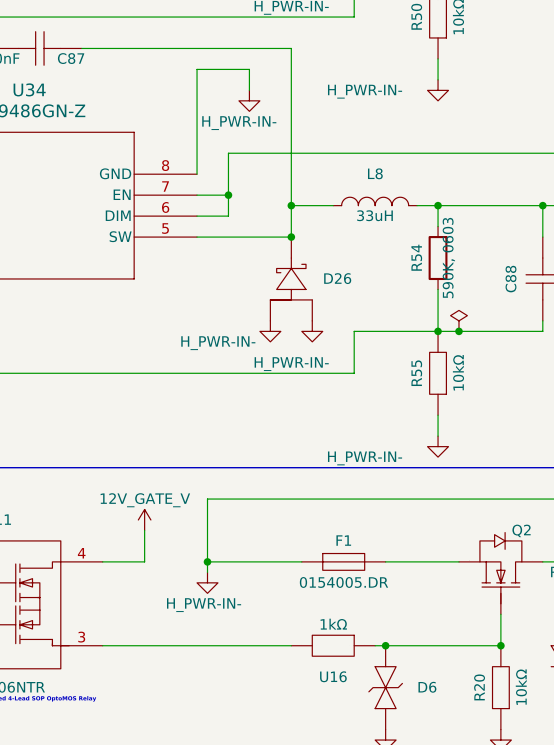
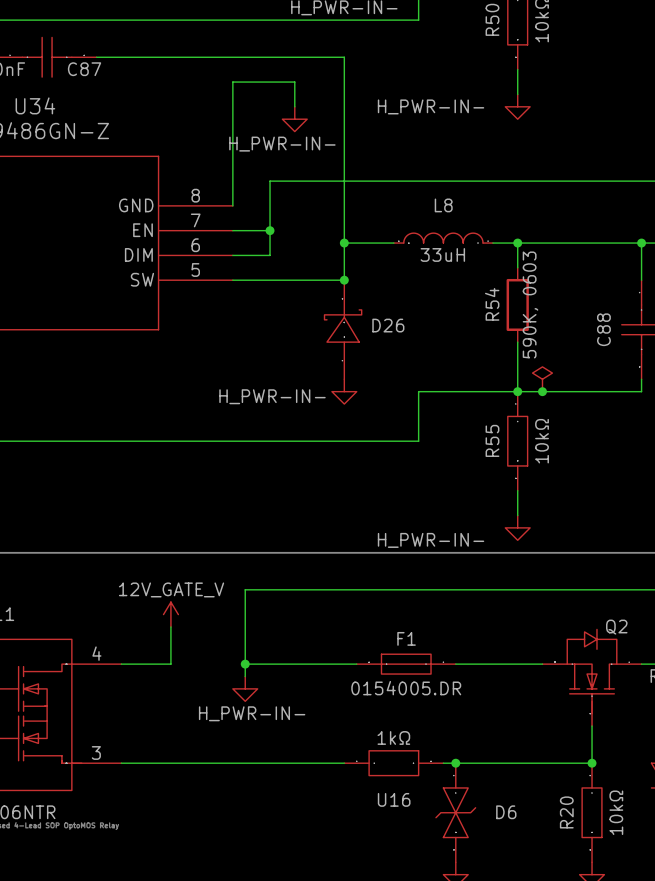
D26 symbol: [270, 237, 313, 321] -> [324, 280, 362, 380]
power symbol: H_PWR-IN- (270, 331) -> none
power symbol: none -> H_PWR-IN- (344, 391)
power symbol: H_PWR-IN- (312, 331) -> none

